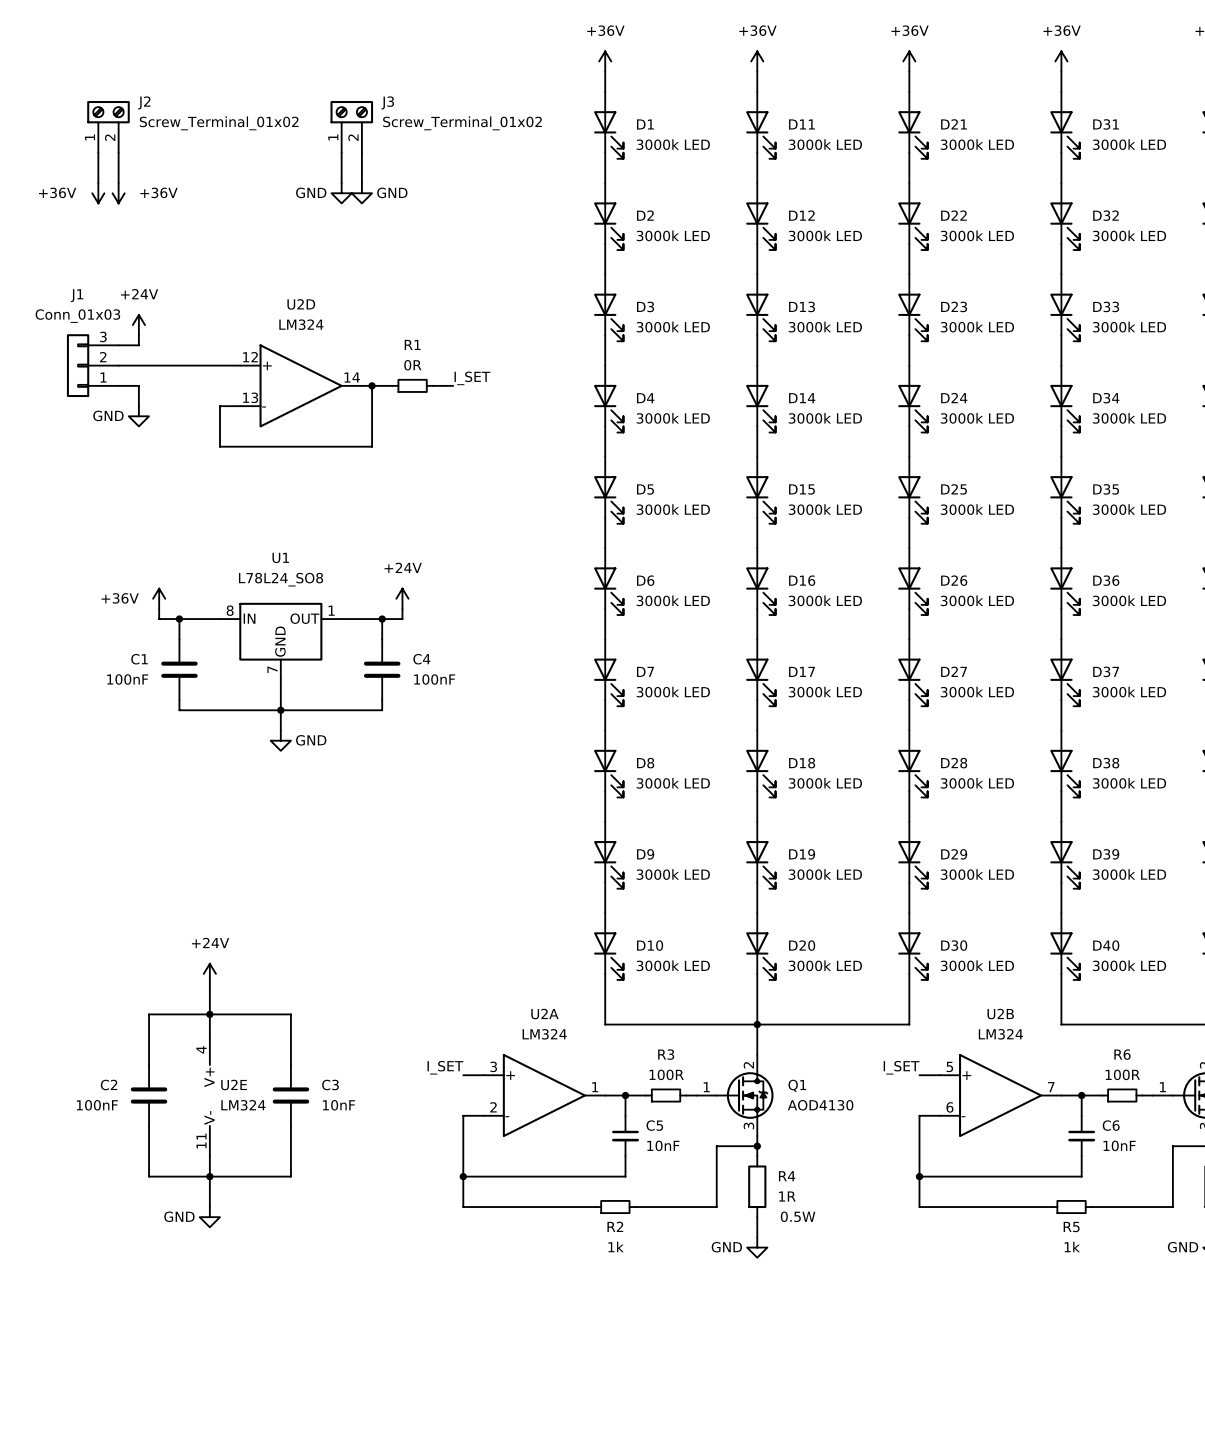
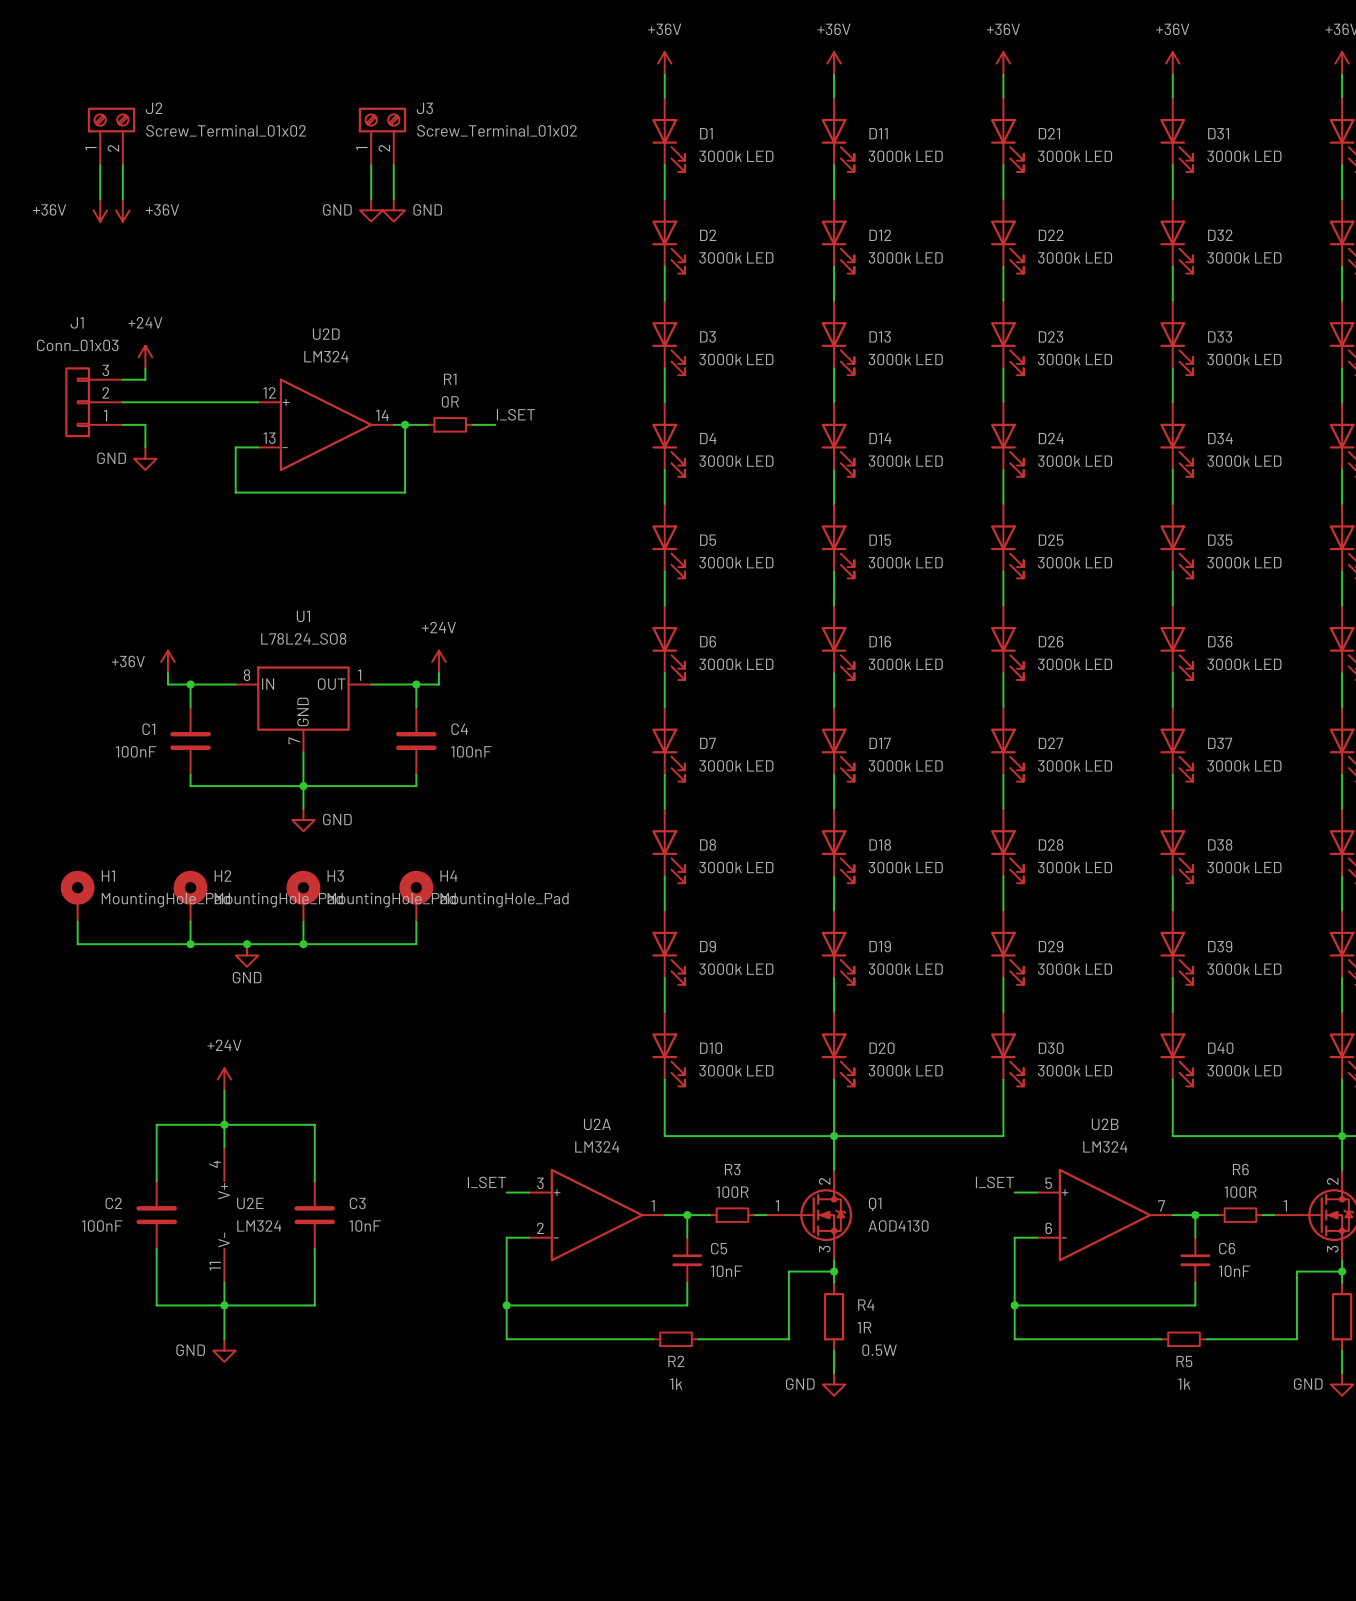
H1: none -> MountingHole_Pad (77, 896)
H2: none -> MountingHole_Pad (190, 896)
H3: none -> MountingHole_Pad (303, 896)
H4: none -> MountingHole_Pad (416, 896)
wire: none -> (77, 921) (77, 944) (416, 944) (416, 921)
wire: none -> (190, 921) (190, 944)
wire: none -> (303, 921) (303, 944)
junction: none -> (190, 944)
junction: none -> (247, 944)
junction: none -> (303, 944)
power symbol: none -> GND (247, 955)

